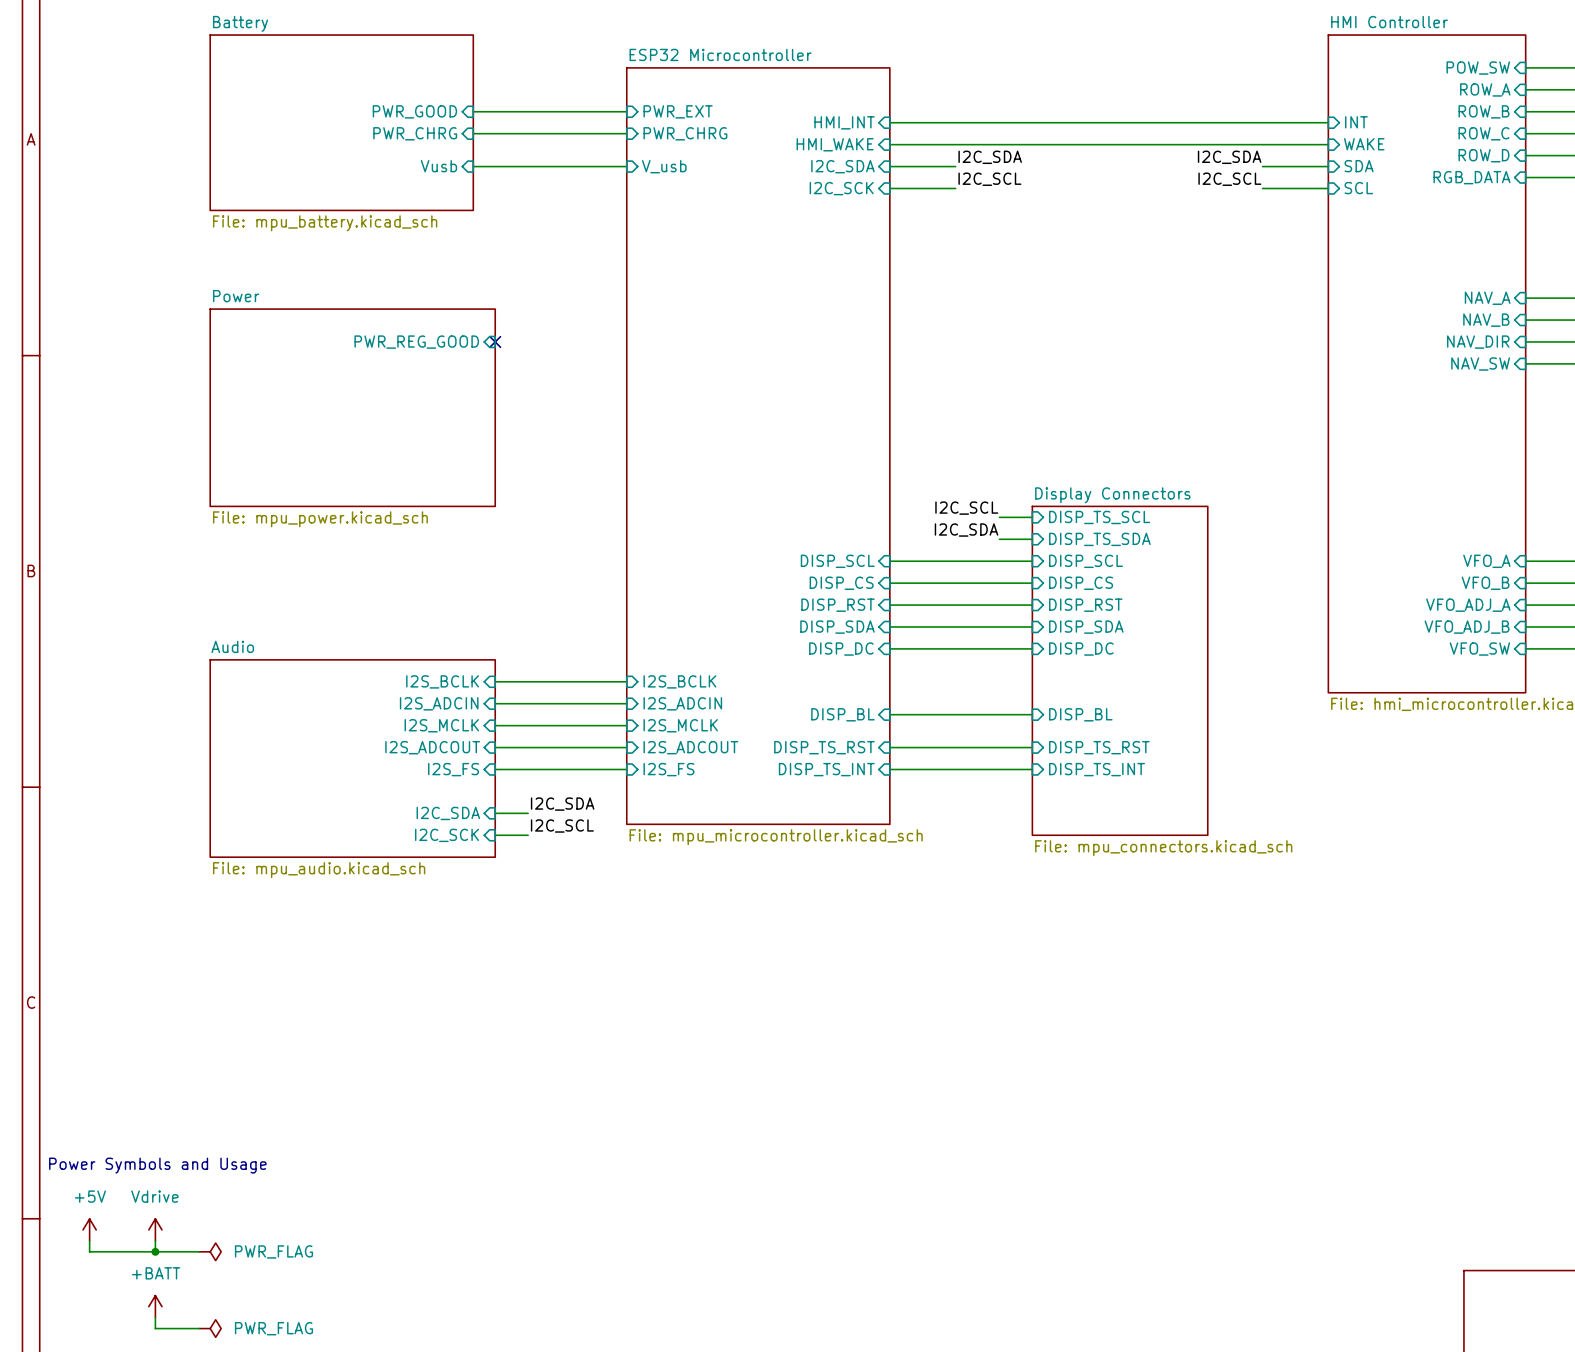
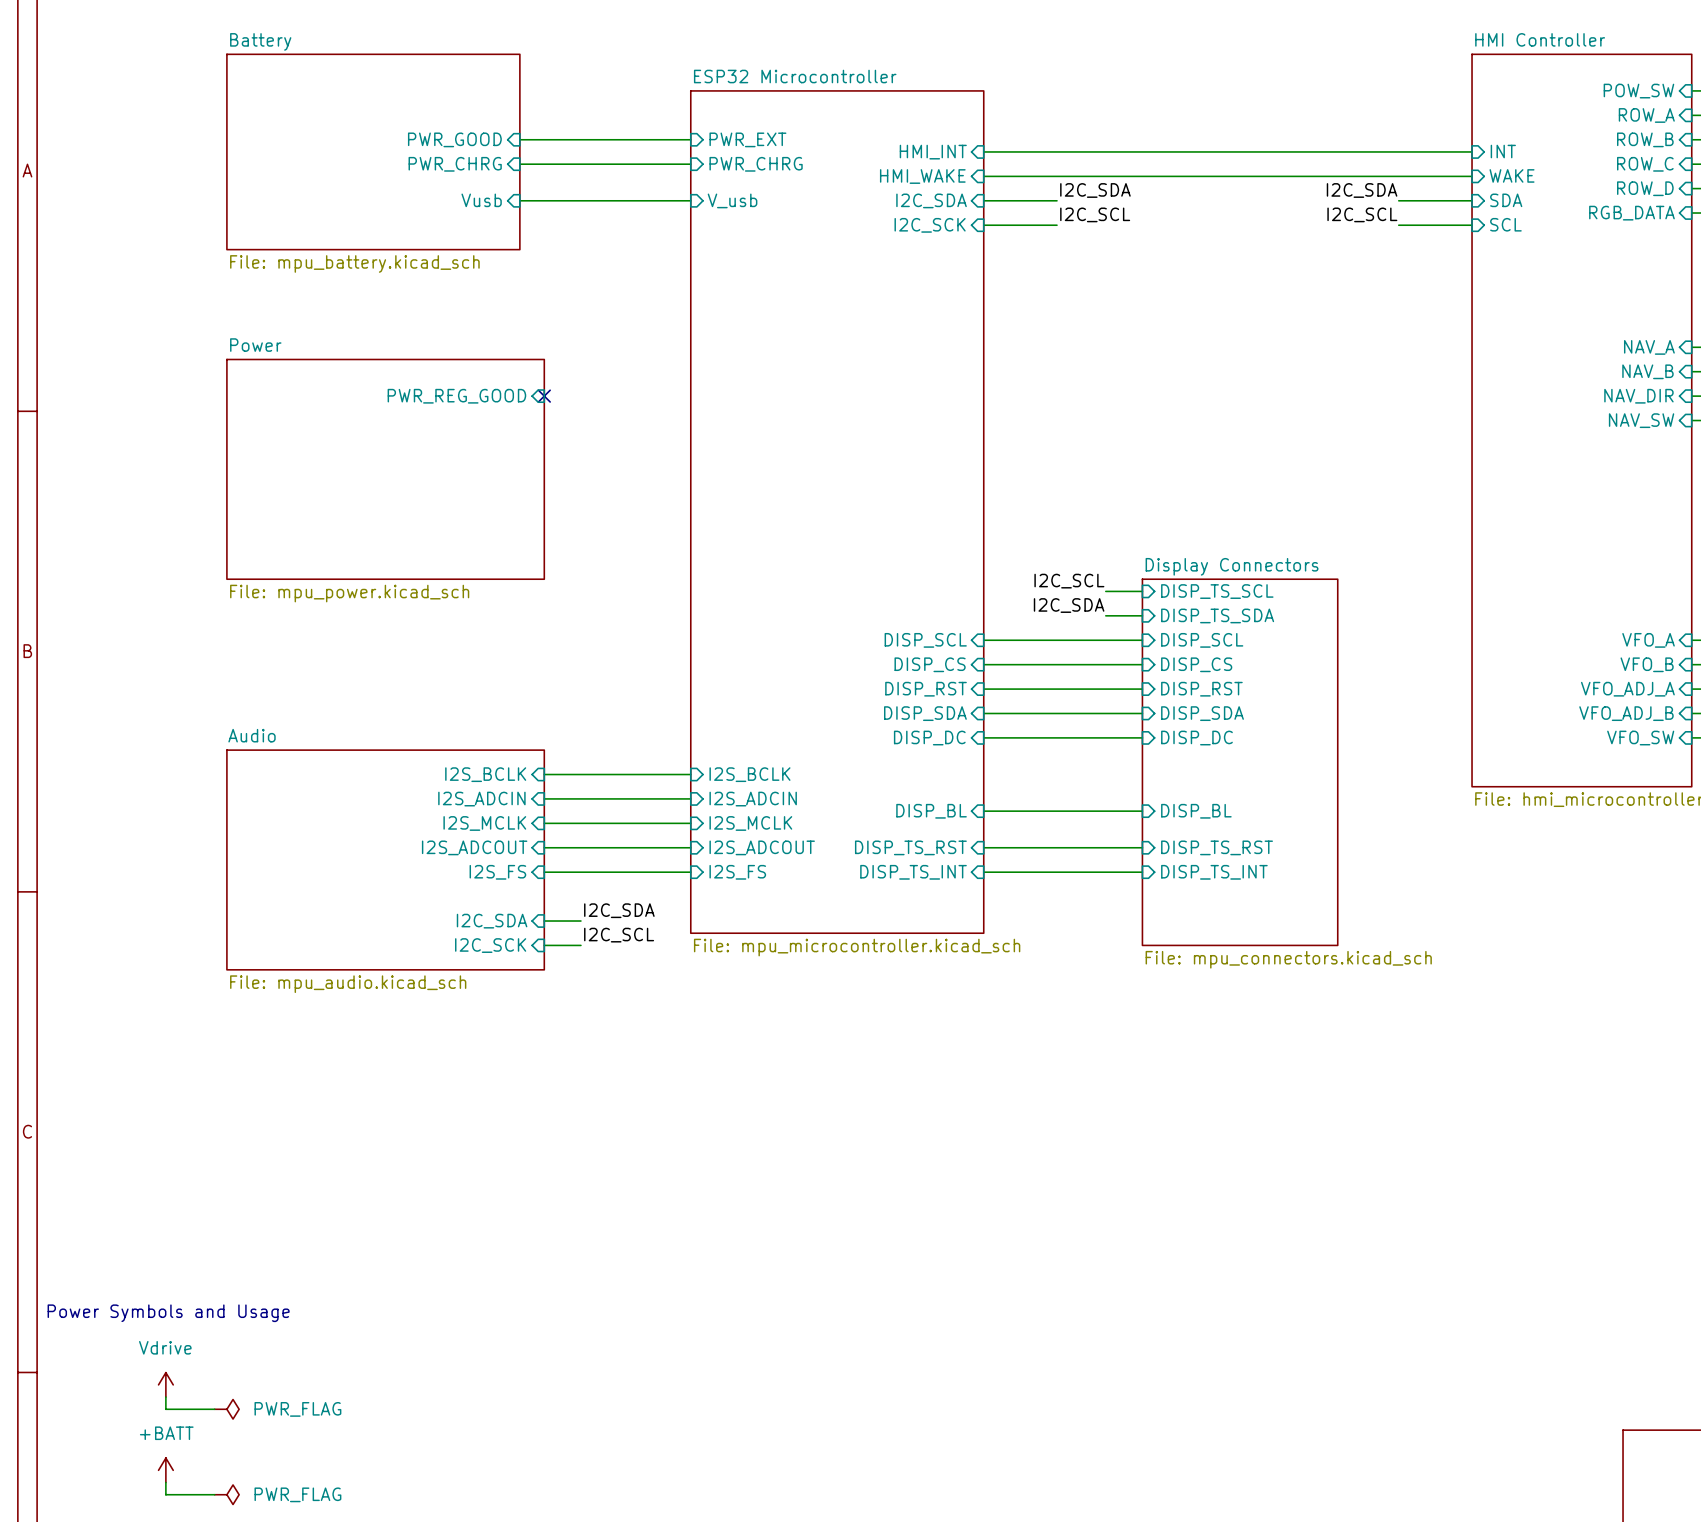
power symbol: +5V (89, 1229) -> none
wire: (89, 1240) (89, 1251) (155, 1251) -> none
junction: (155, 1251) -> none

